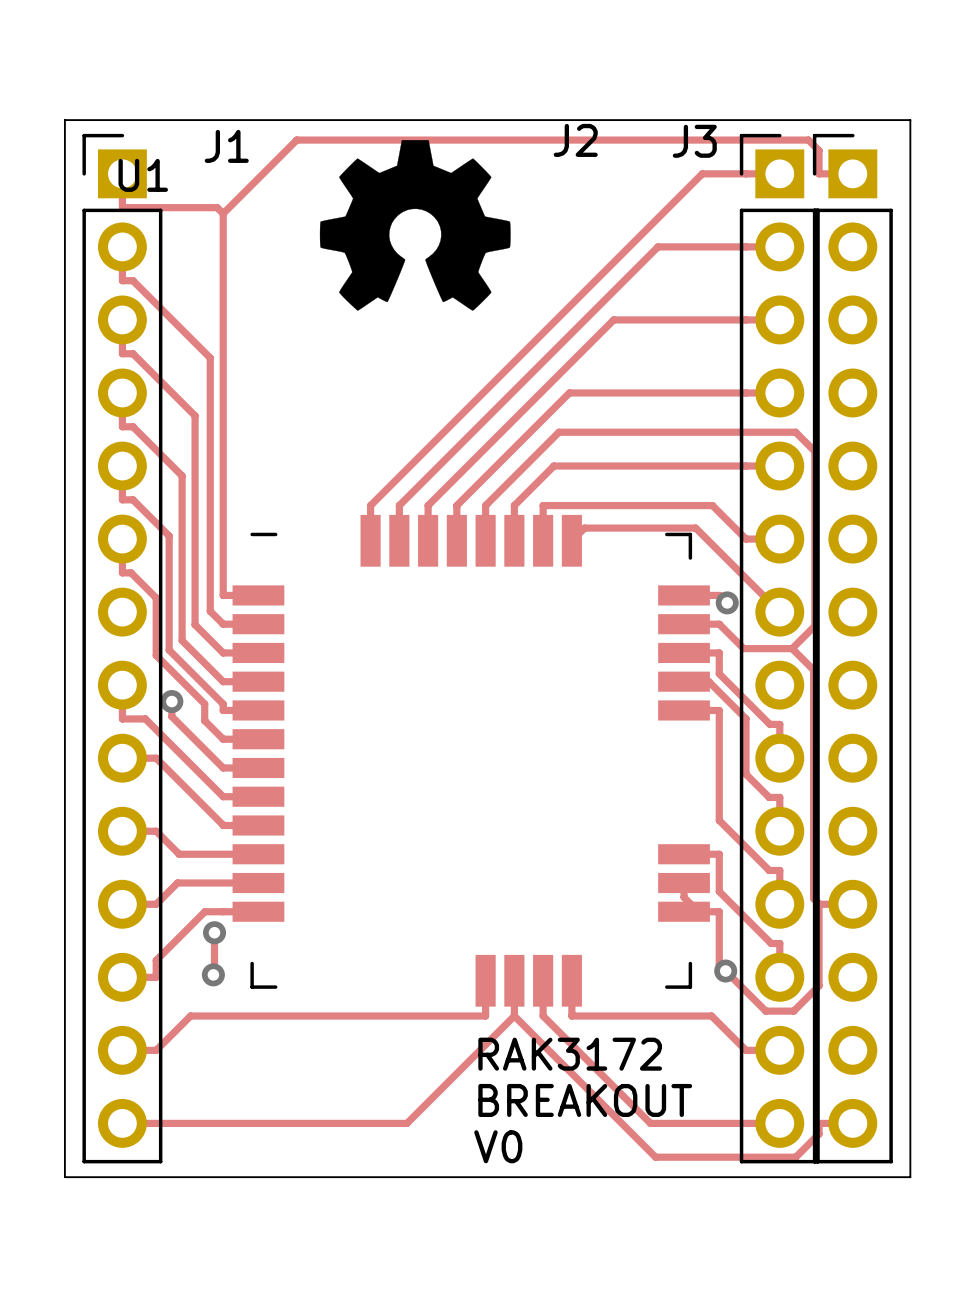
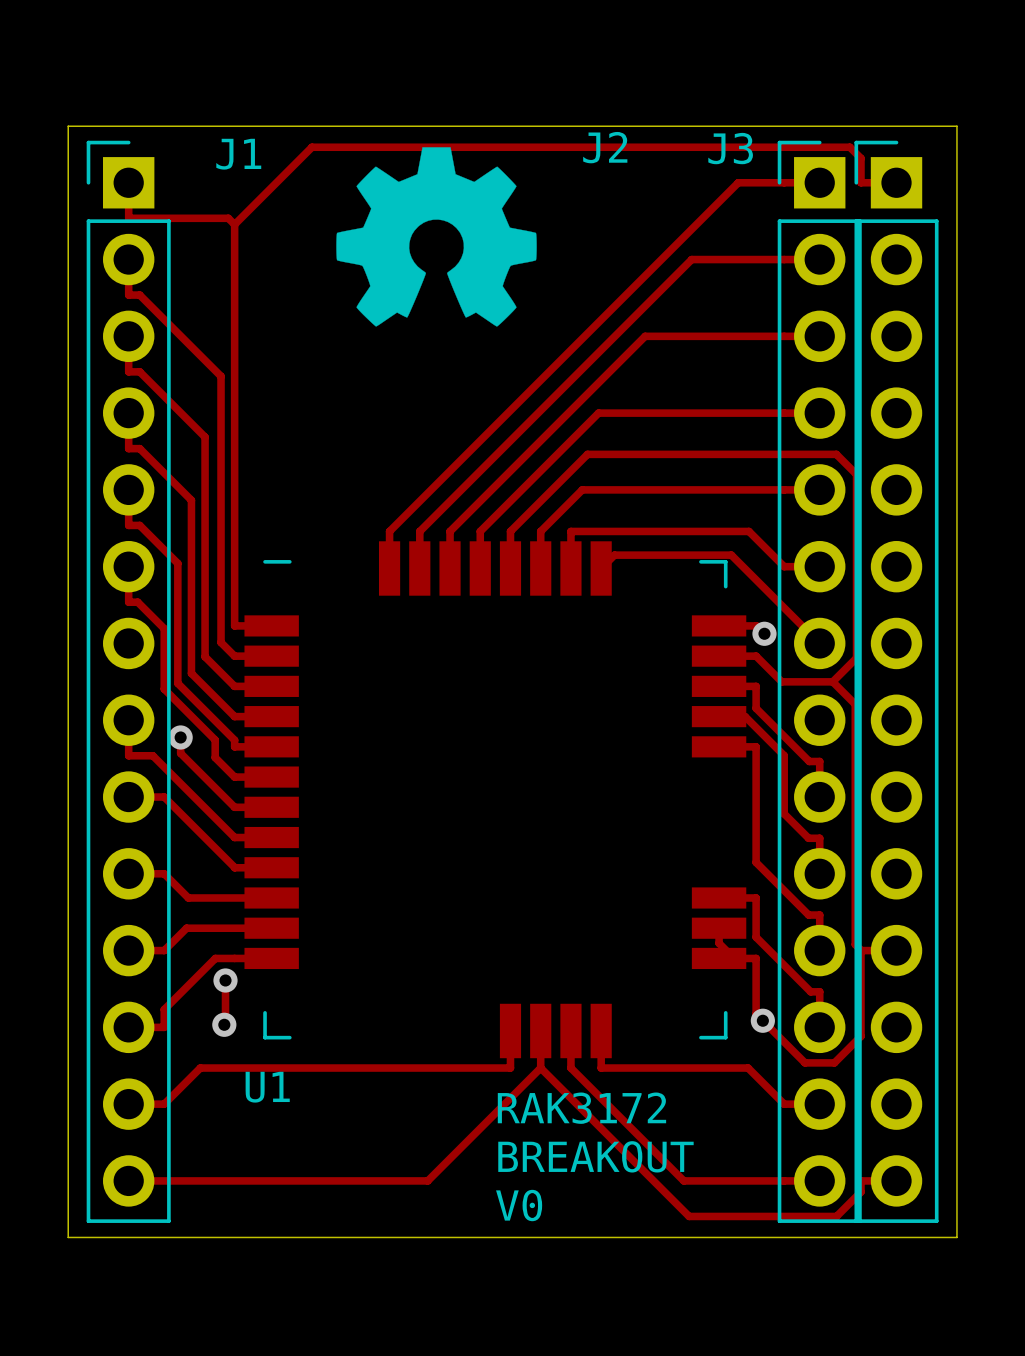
U1 name position: U1 (143, 175) -> U1 (267, 1087)

